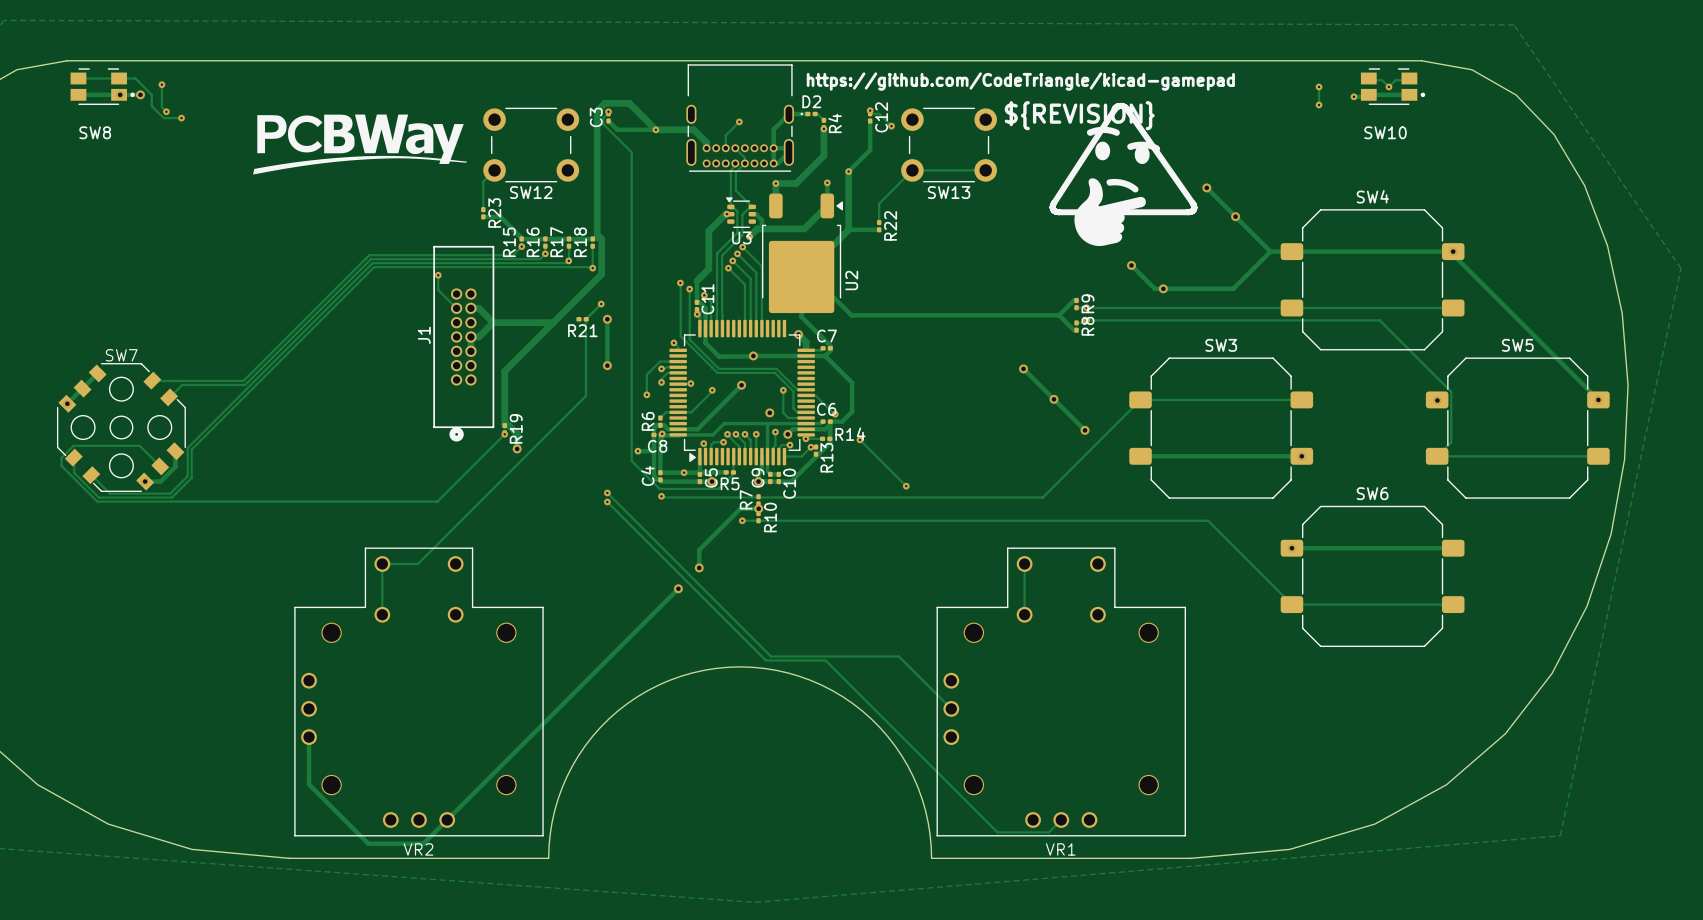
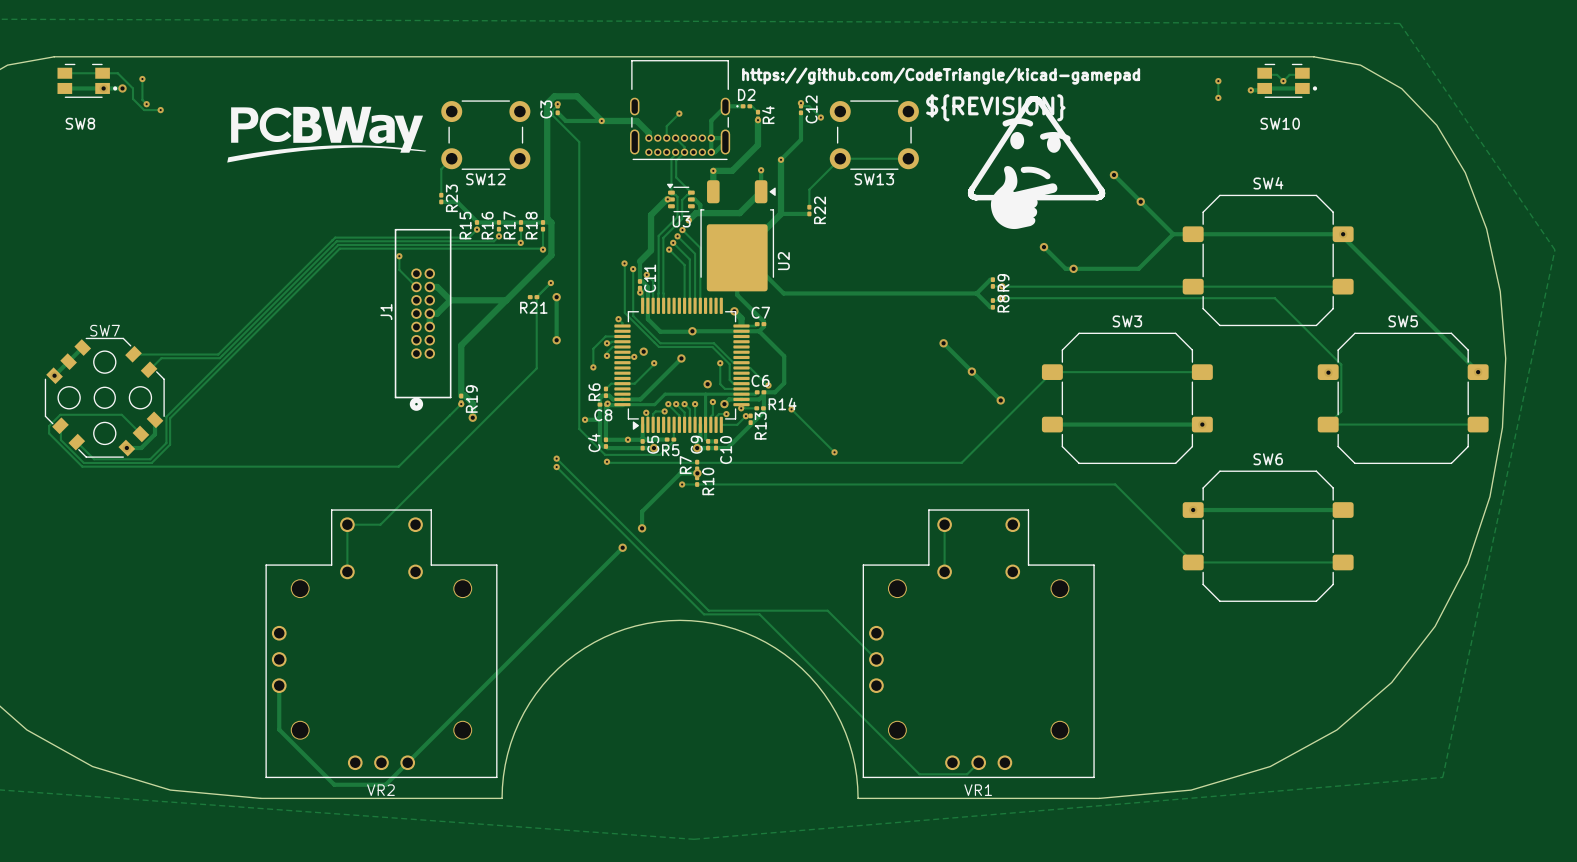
via: none -> (643, 351)

